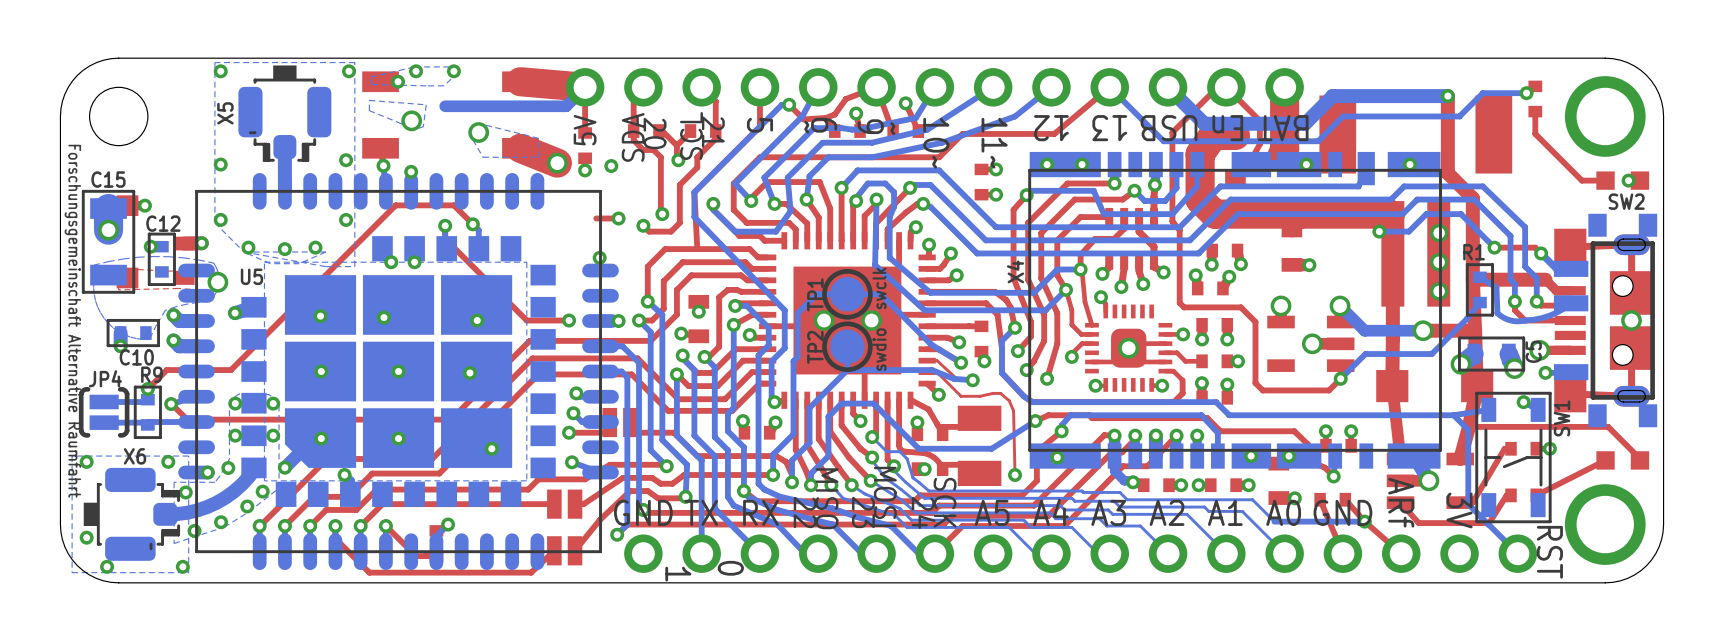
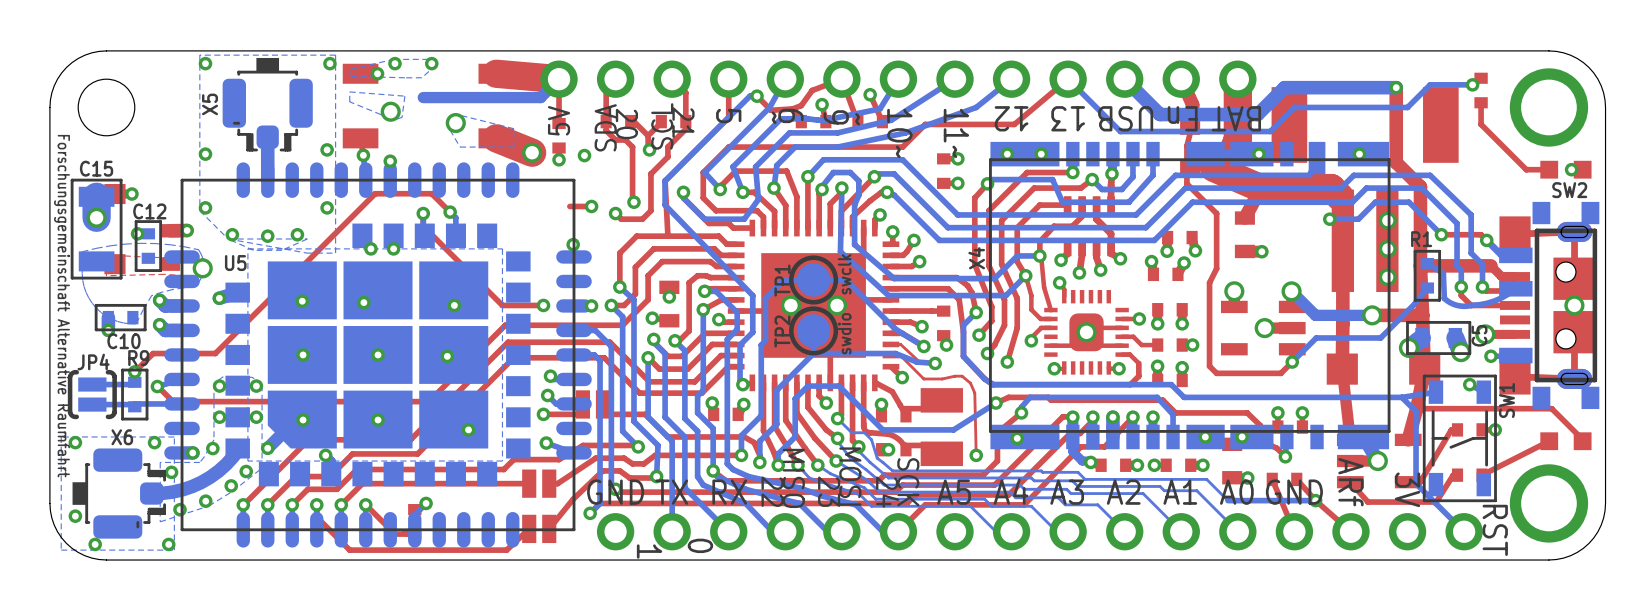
top track: (1235, 135) (1213, 135) (1200, 154) (1200, 199) (1214, 214) (1392, 214) -> (1213, 167) (1260, 188) (1331, 188) (1342, 199) (1342, 202)
top track: (1235, 179) (1252, 157) (1259, 144) (1259, 120) (1226, 87) (1217, 87) (1172, 132) (1172, 221) (1179, 230) (1179, 303) (1184, 307) (1240, 307) (1255, 321) -> (1181, 79) (1192, 104) (1192, 123) (1186, 146) (1186, 183) (1216, 213) (1216, 268) (1209, 282) (1209, 306)

